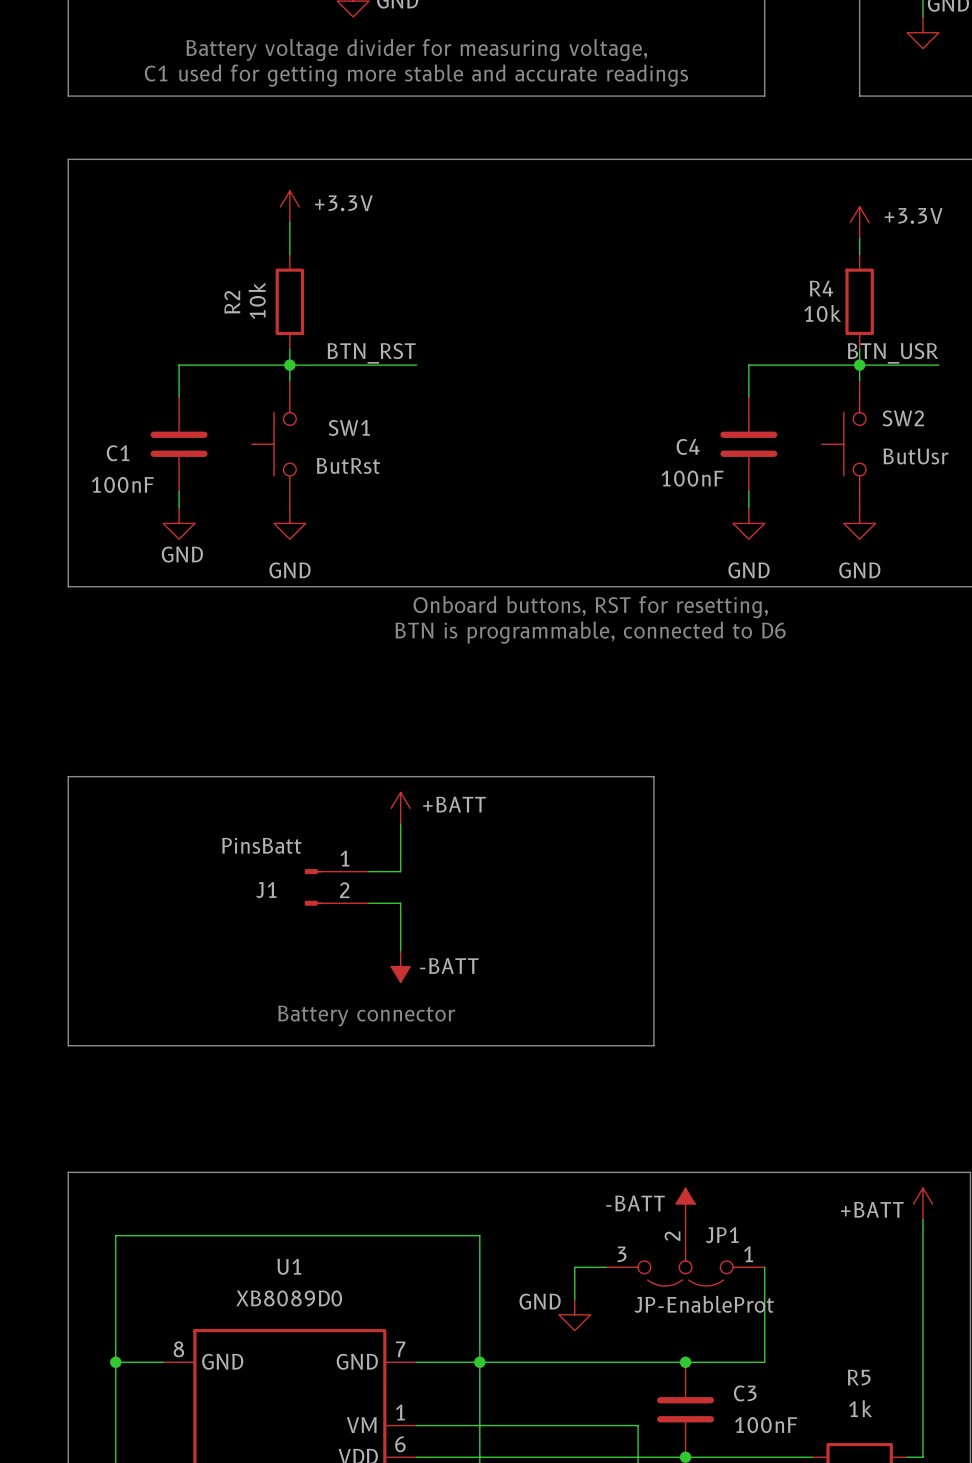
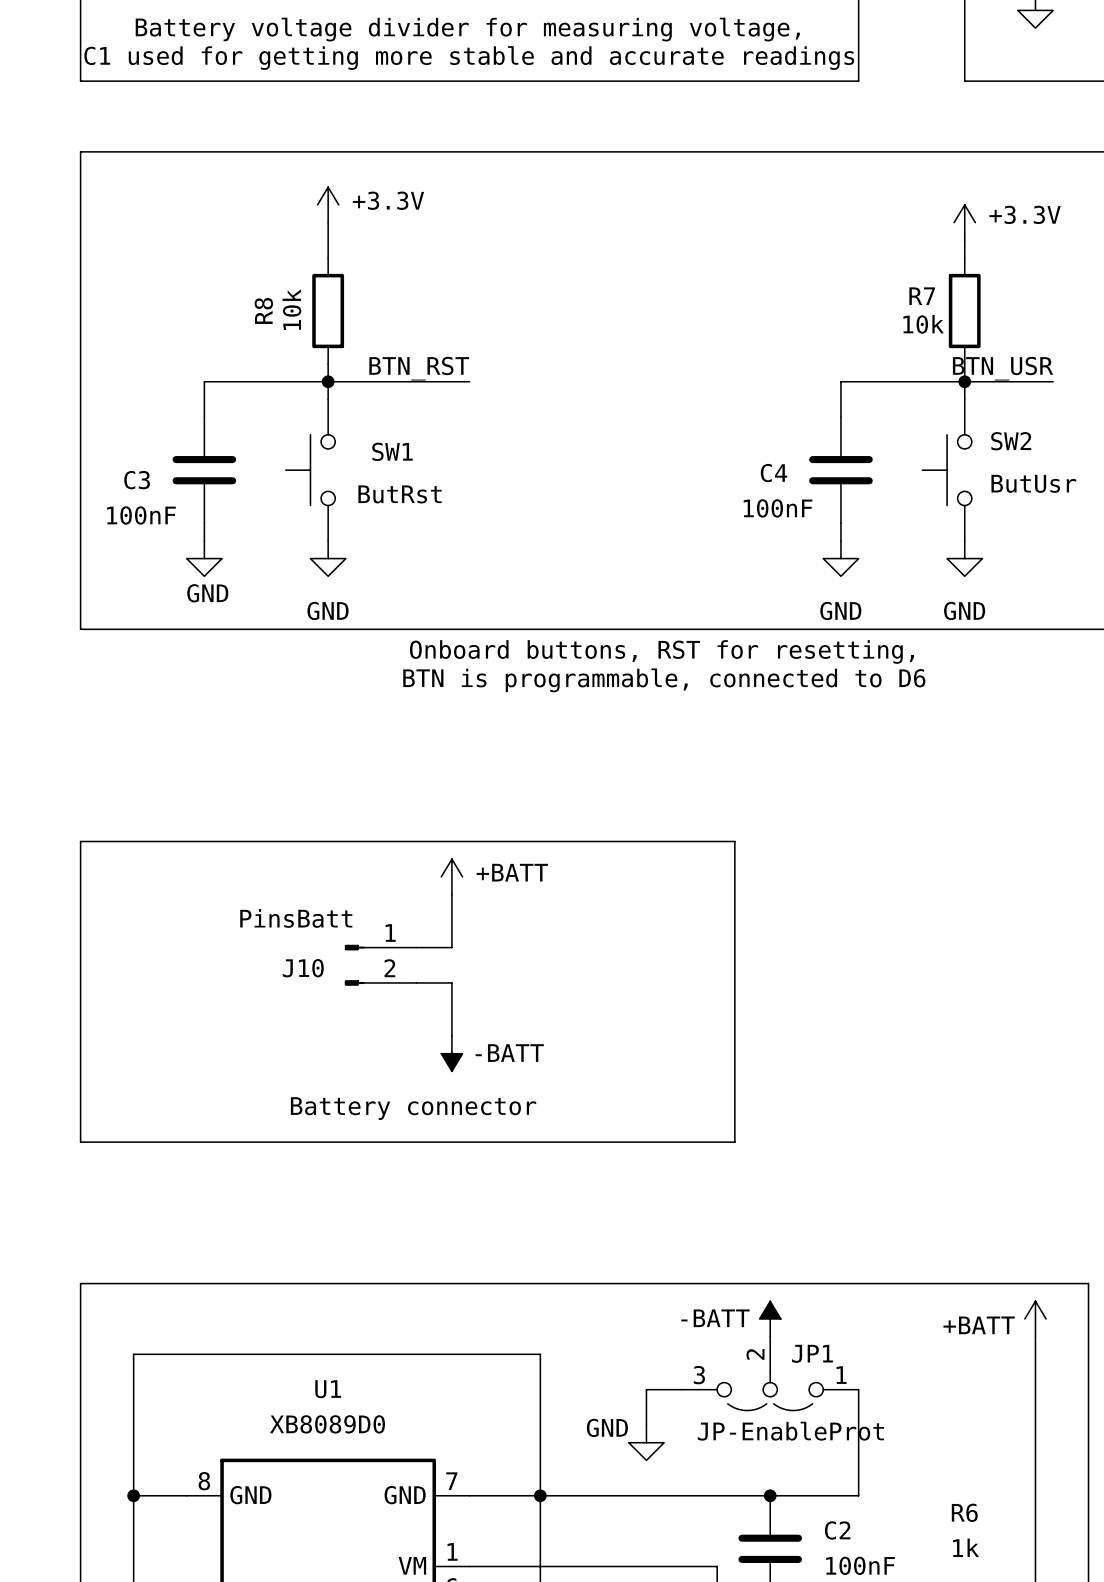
R4 name: R4 (821, 288) -> R7 (922, 296)
R2 name: R2 (232, 302) -> R8 (263, 310)
C1 name: C1 (118, 453) -> C3 (137, 480)
J1 name: J1 (266, 890) -> J10 (303, 968)
R5 name: R5 (859, 1377) -> R6 (964, 1512)
C3 name: C3 (745, 1393) -> C2 (837, 1530)

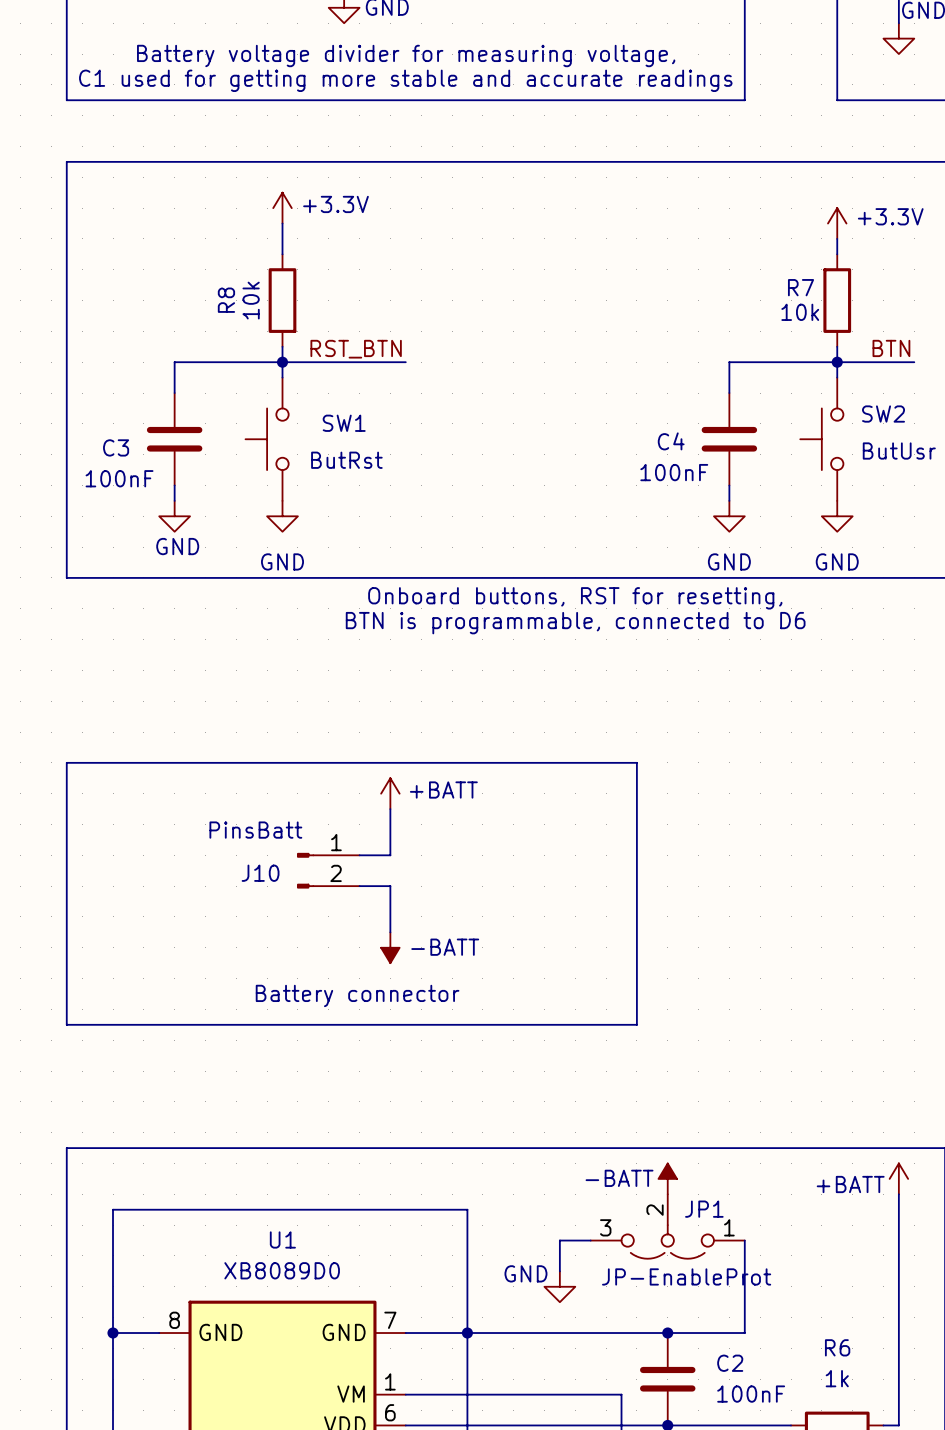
label: BTN_RST (419, 368) -> RST_BTN (356, 349)
label: BTN_USR (1003, 368) -> BTN (891, 348)

